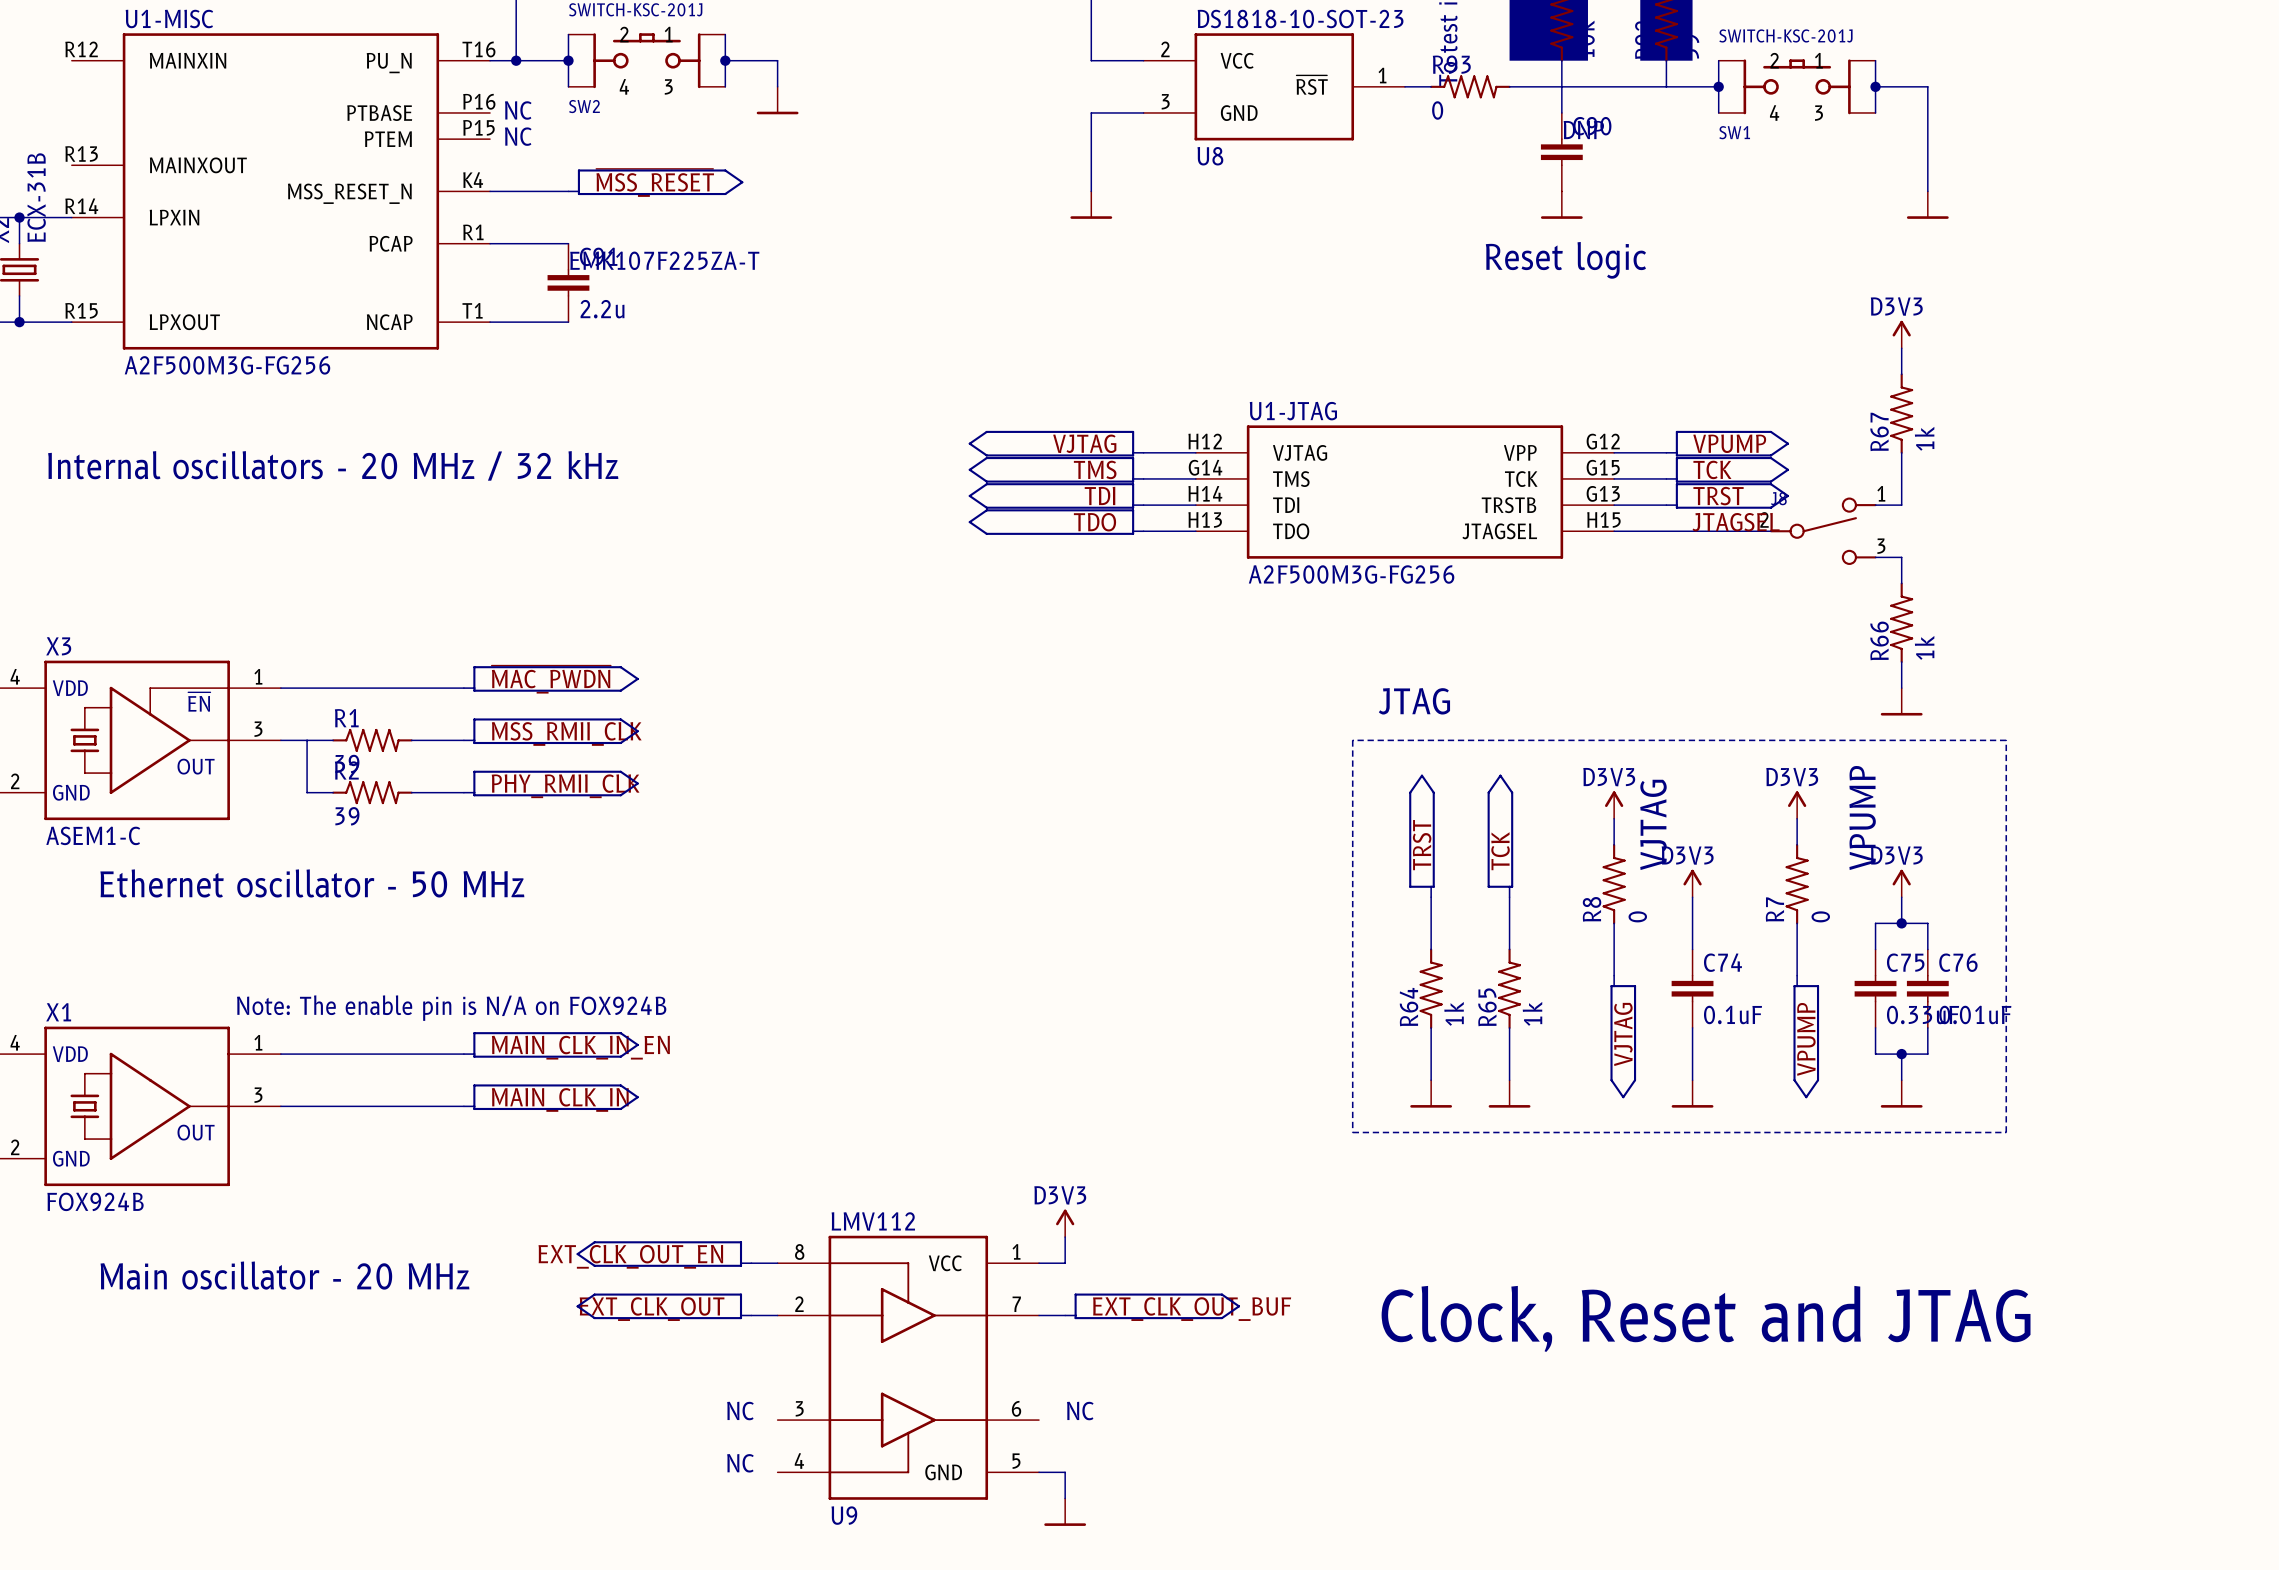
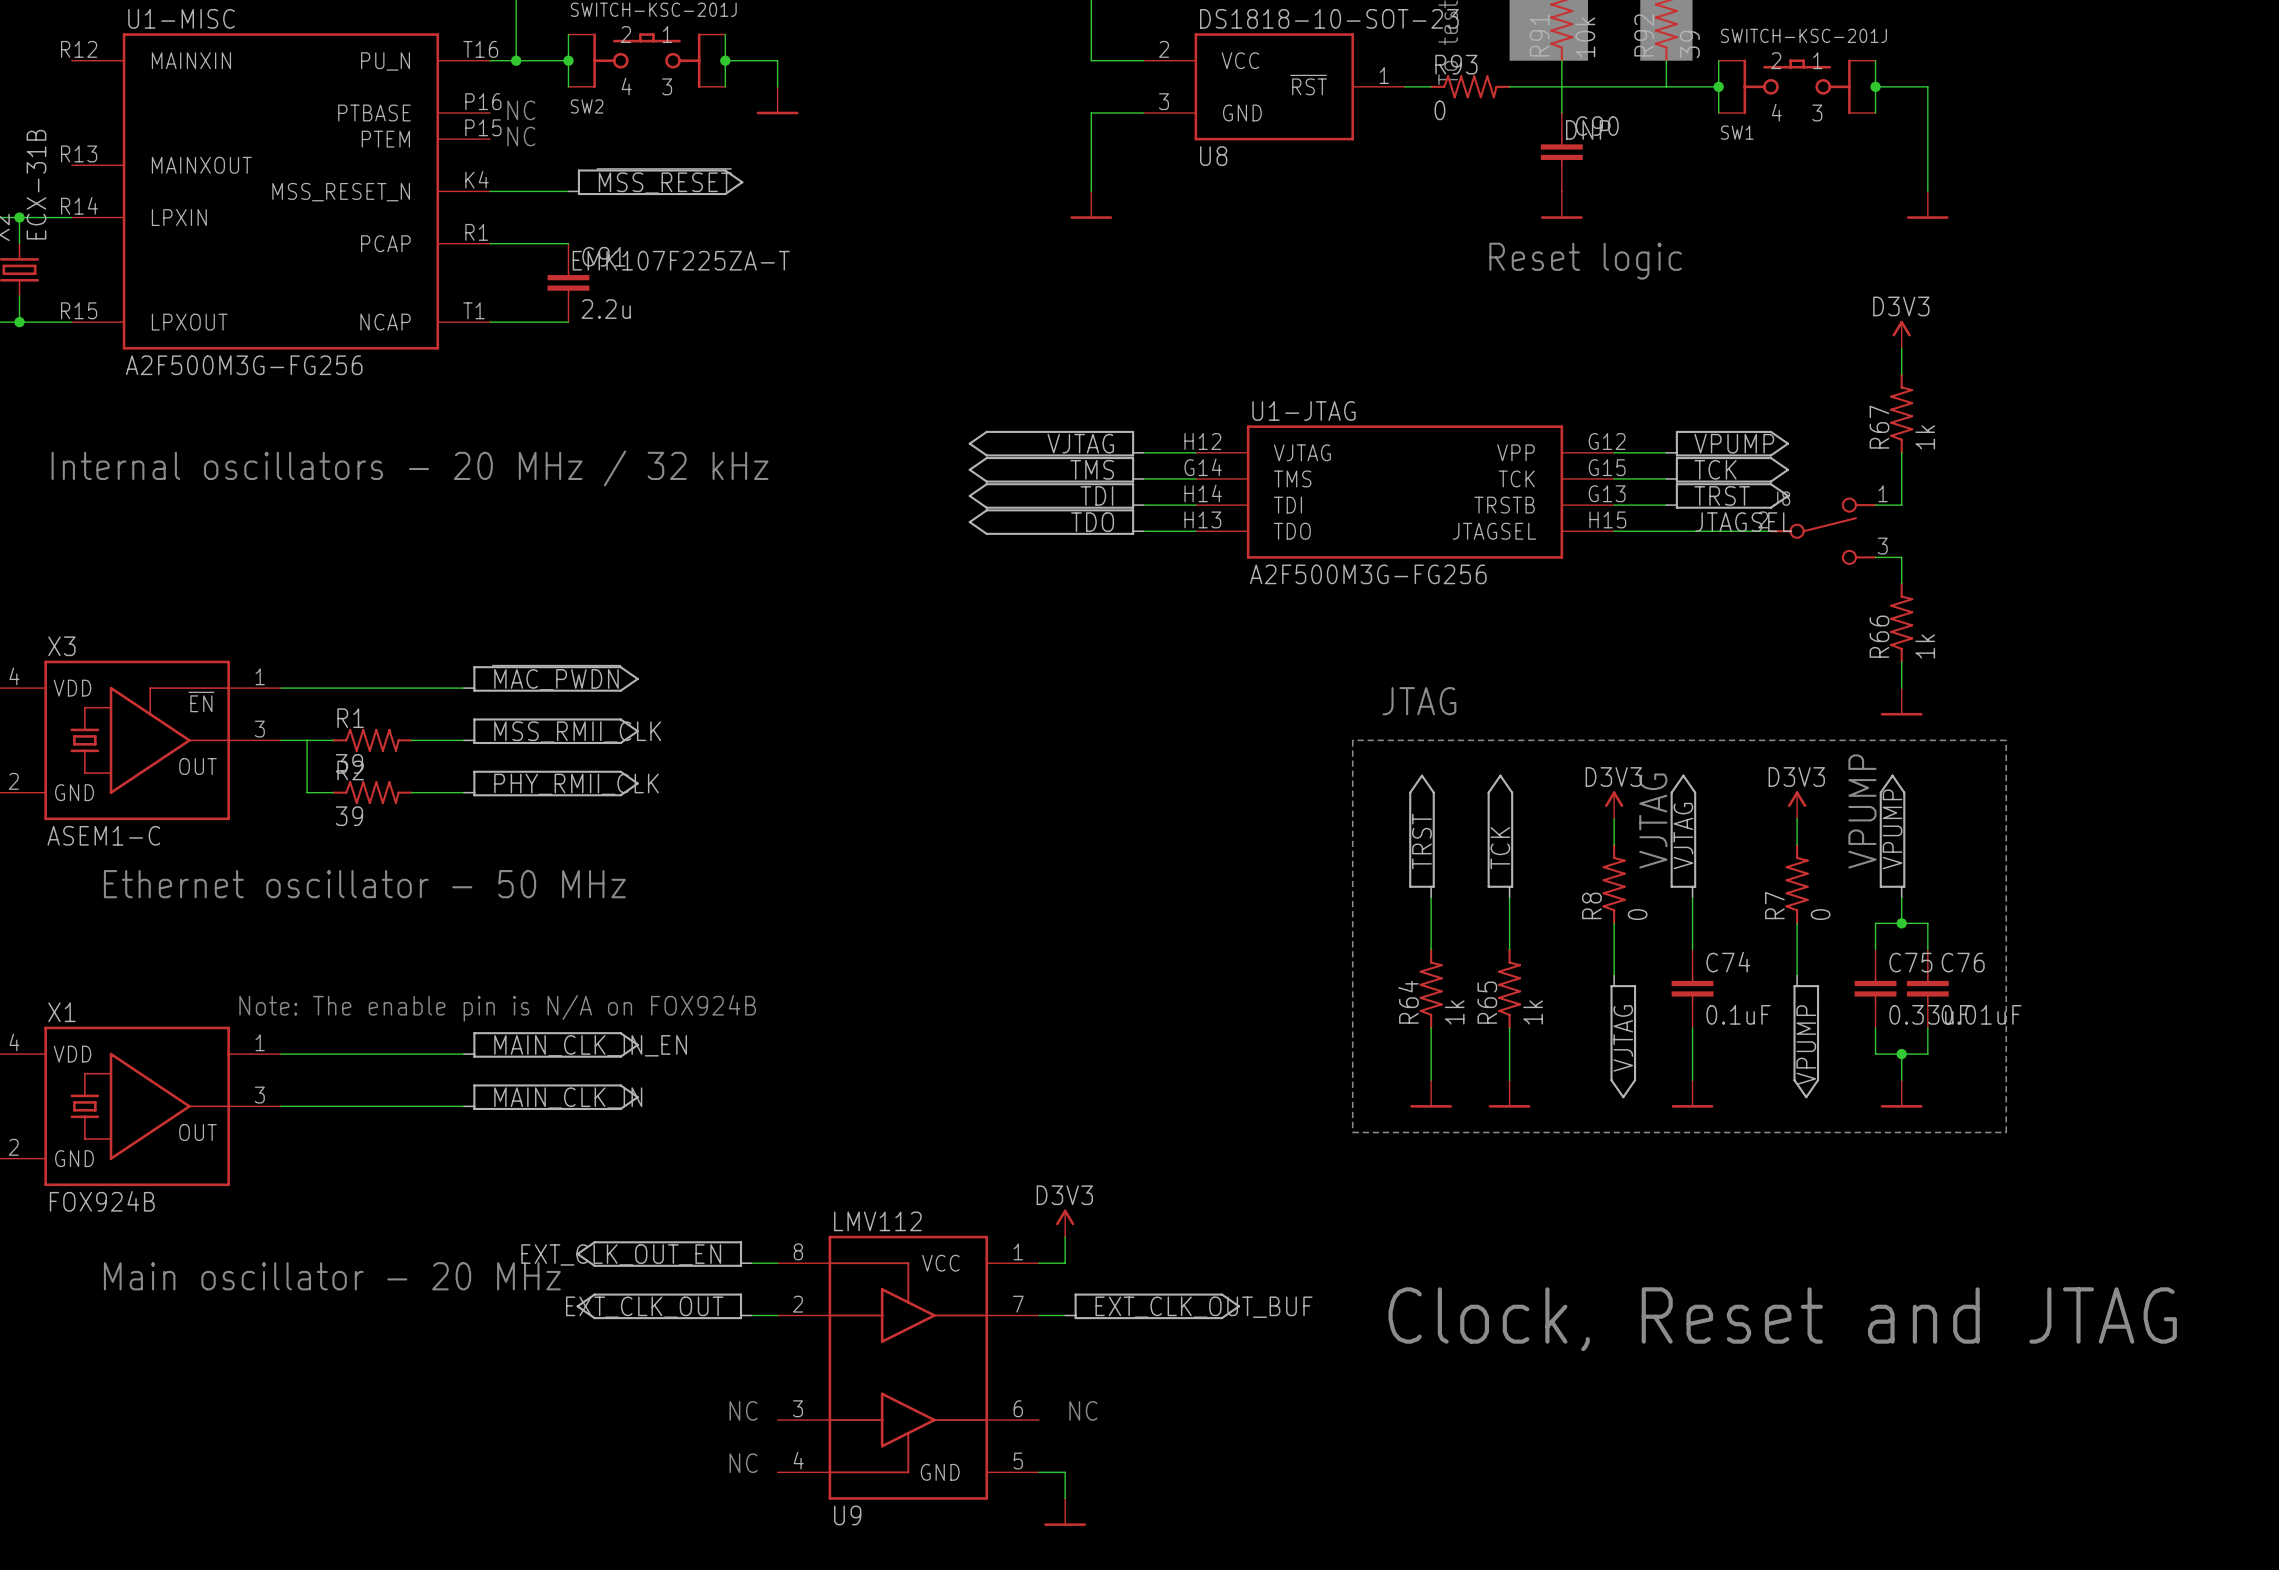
label: none -> VPUMP (1892, 829)
part: none -> (1683, 836)
part: none -> (1892, 836)
label: none -> VJTAG (1683, 836)
power symbol: D3V3 (1692, 883) -> none
power symbol: D3V3 (1901, 883) -> none

